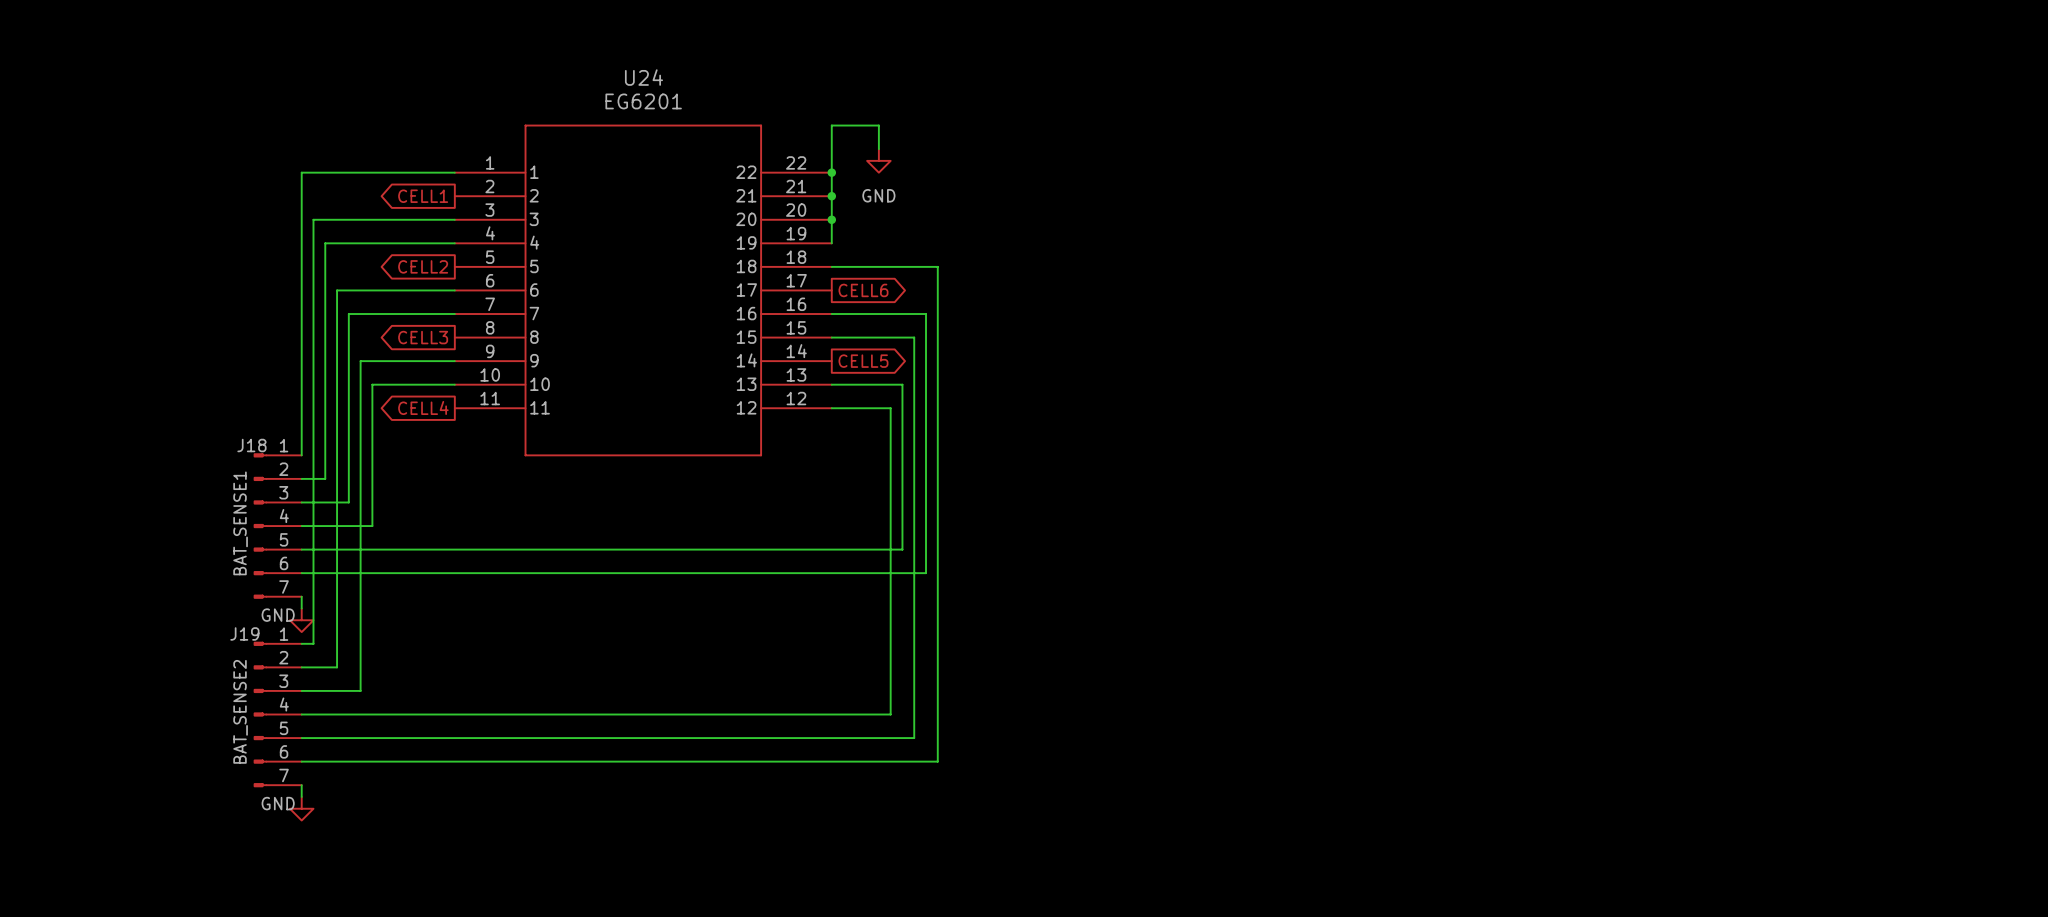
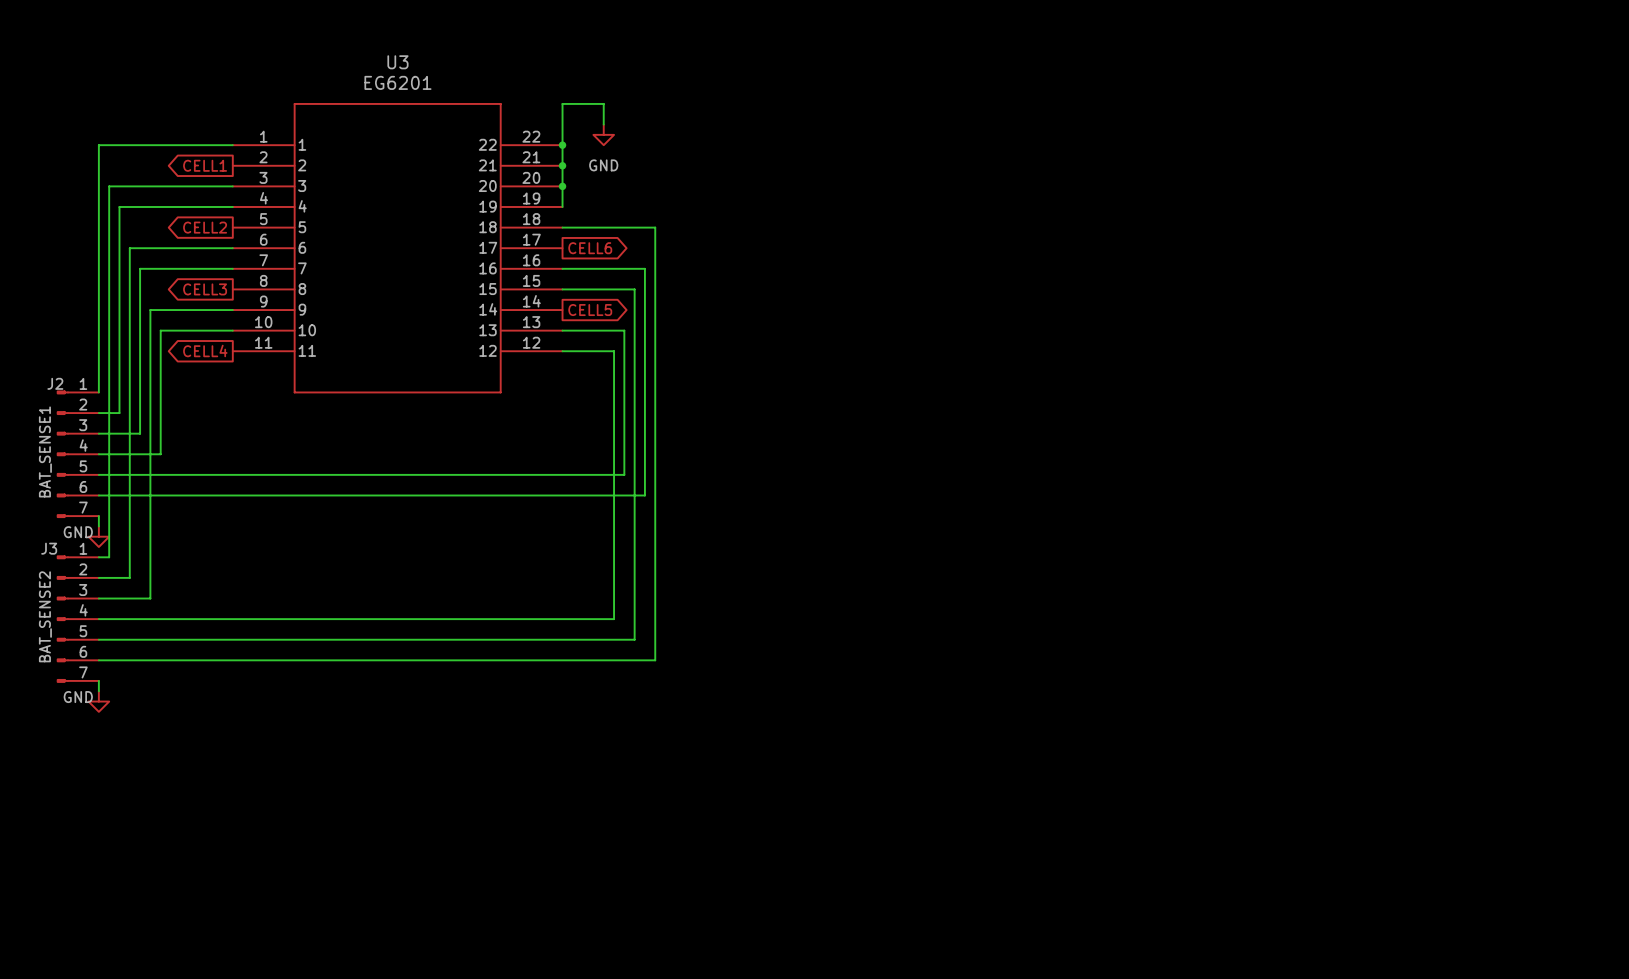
U24 name: U24 (643, 77) -> U3 (397, 62)
J18 name: J18 (251, 445) -> J2 (55, 383)
J19 name: J19 (244, 633) -> J3 (49, 548)

